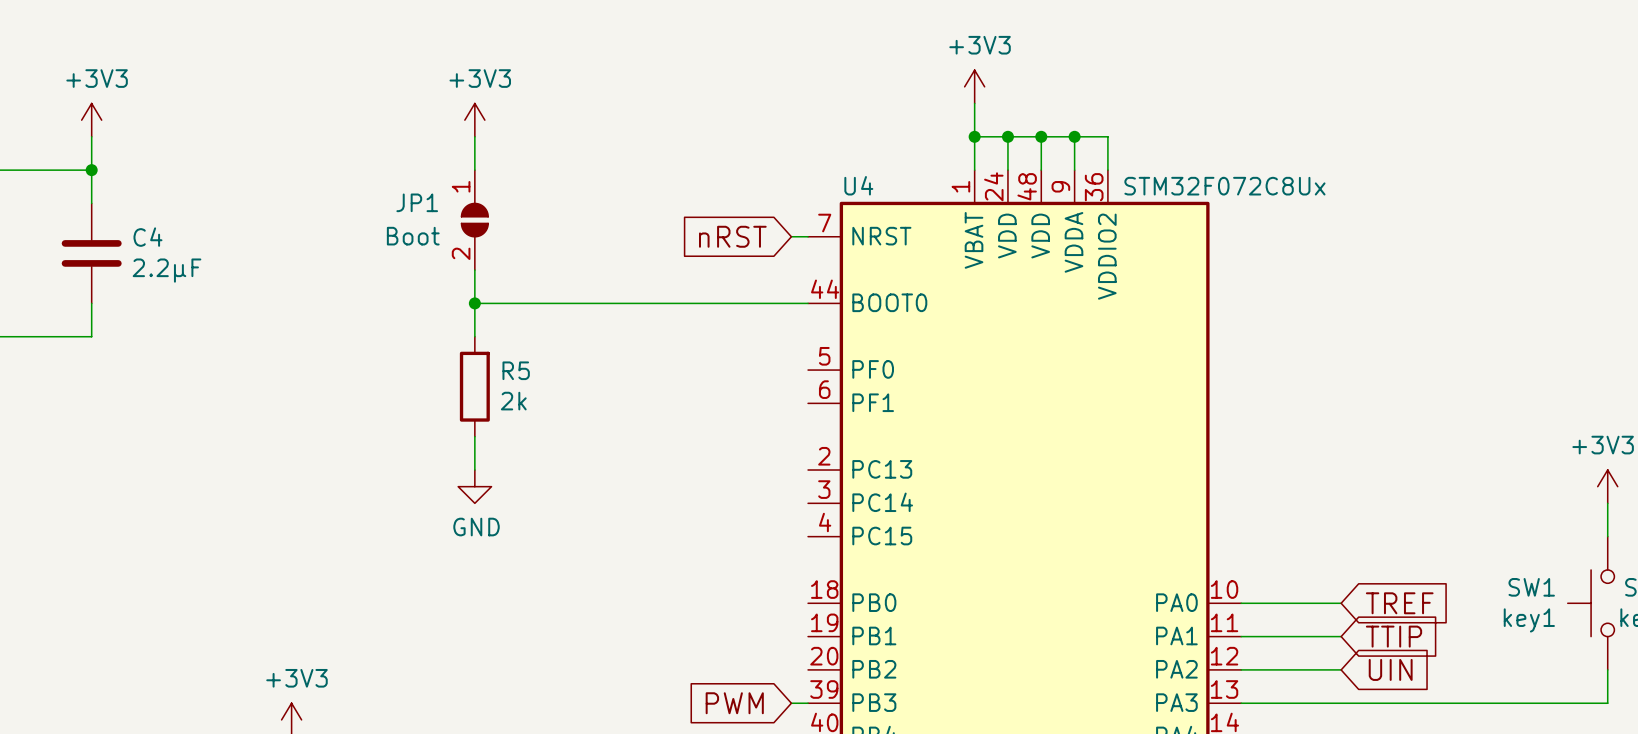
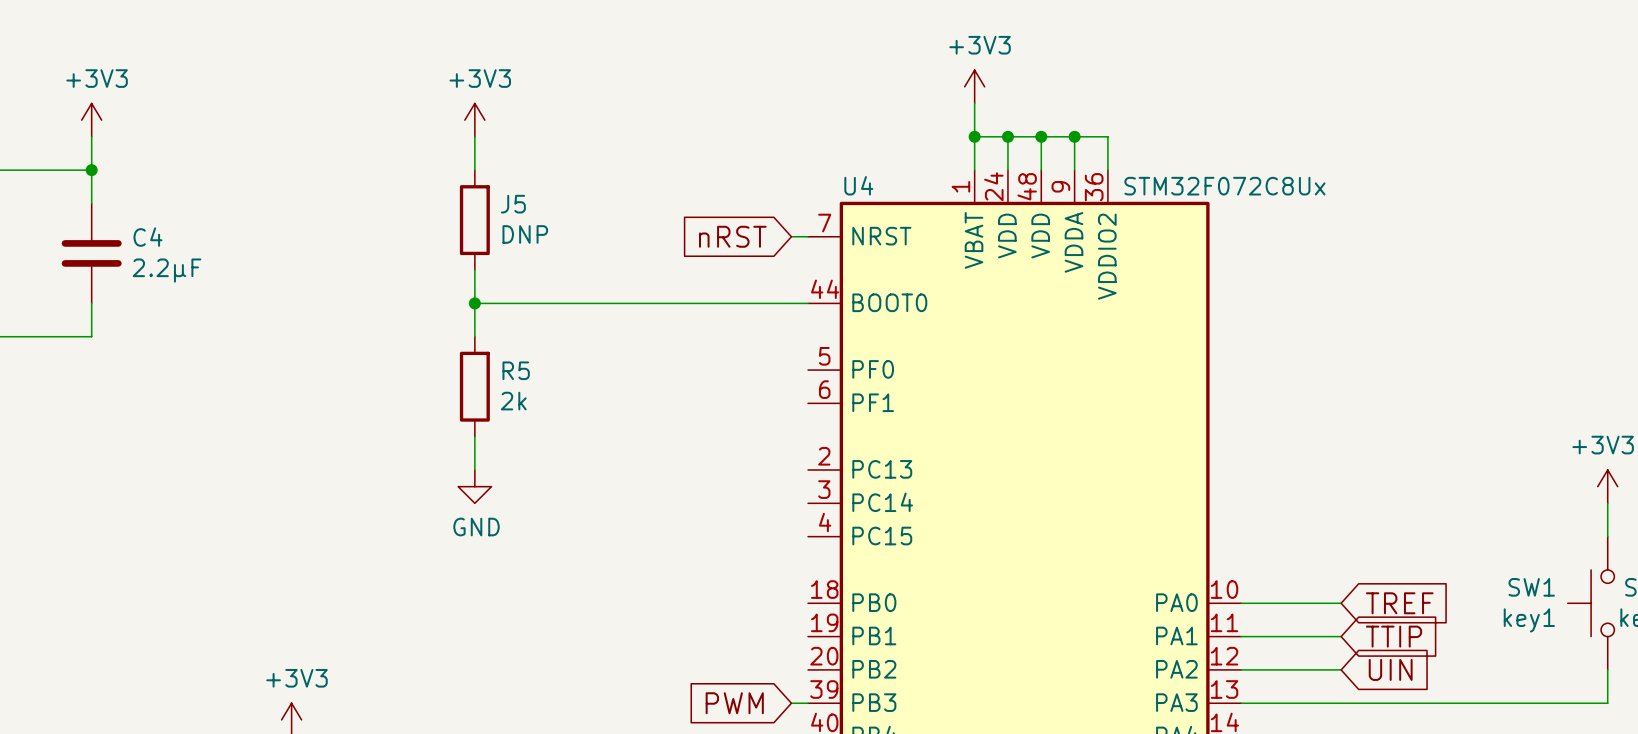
JP1: Boot (474, 220) -> none
J5: none -> DNP (474, 220)

